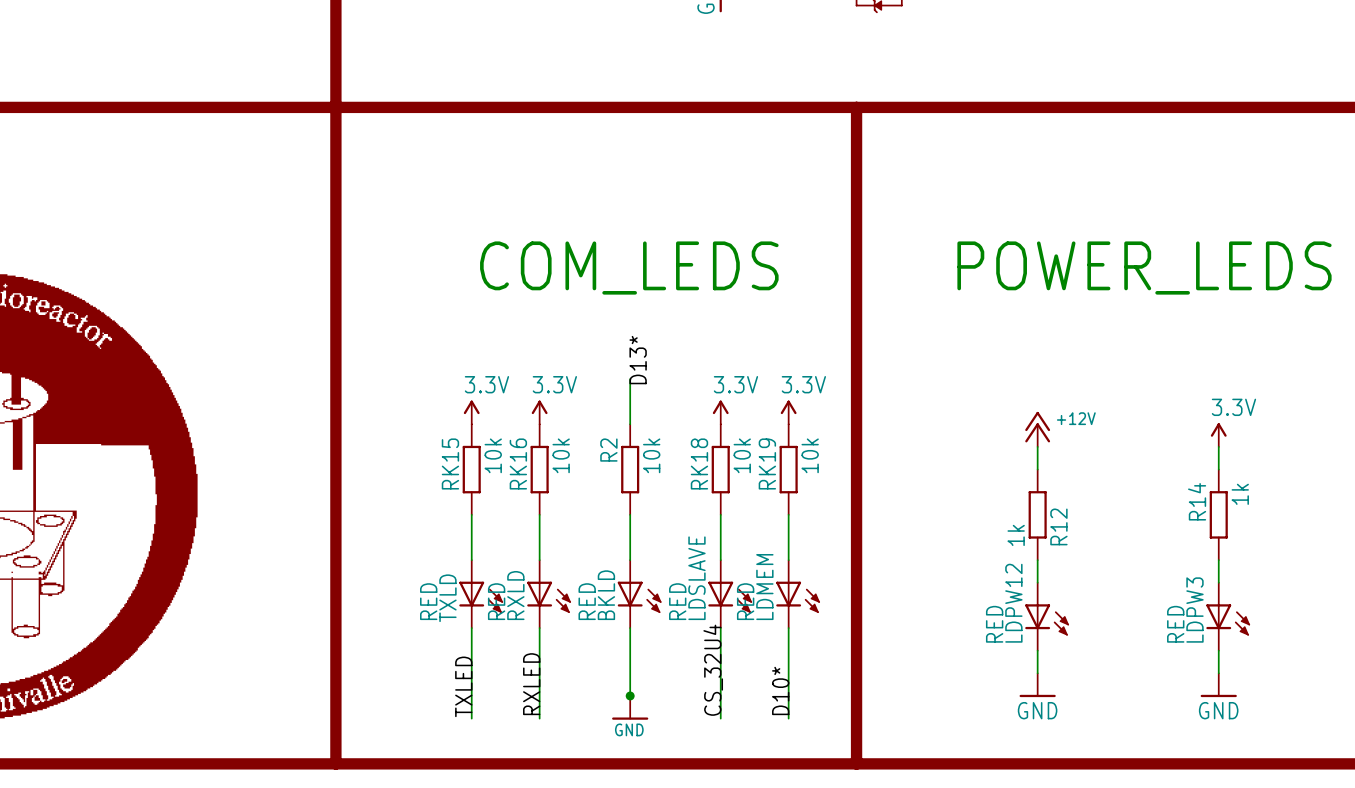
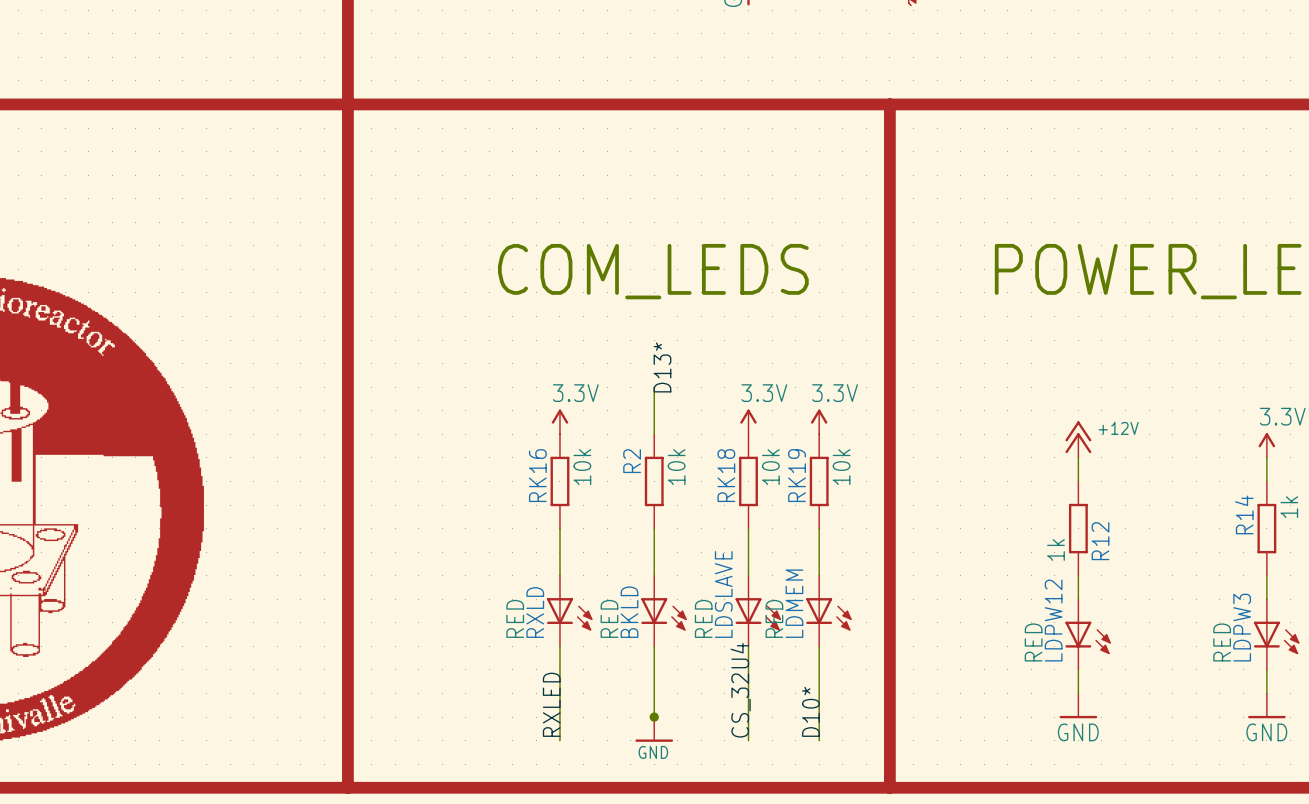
power symbol: 3.3V (471, 412) -> none
RK15: 10k (471, 469) -> none
wire: (471, 514) (471, 560) -> none
TXLD: RED (481, 594) -> none
wire: (471, 628) (471, 718) -> none
label: TXLED (463, 686) -> none

